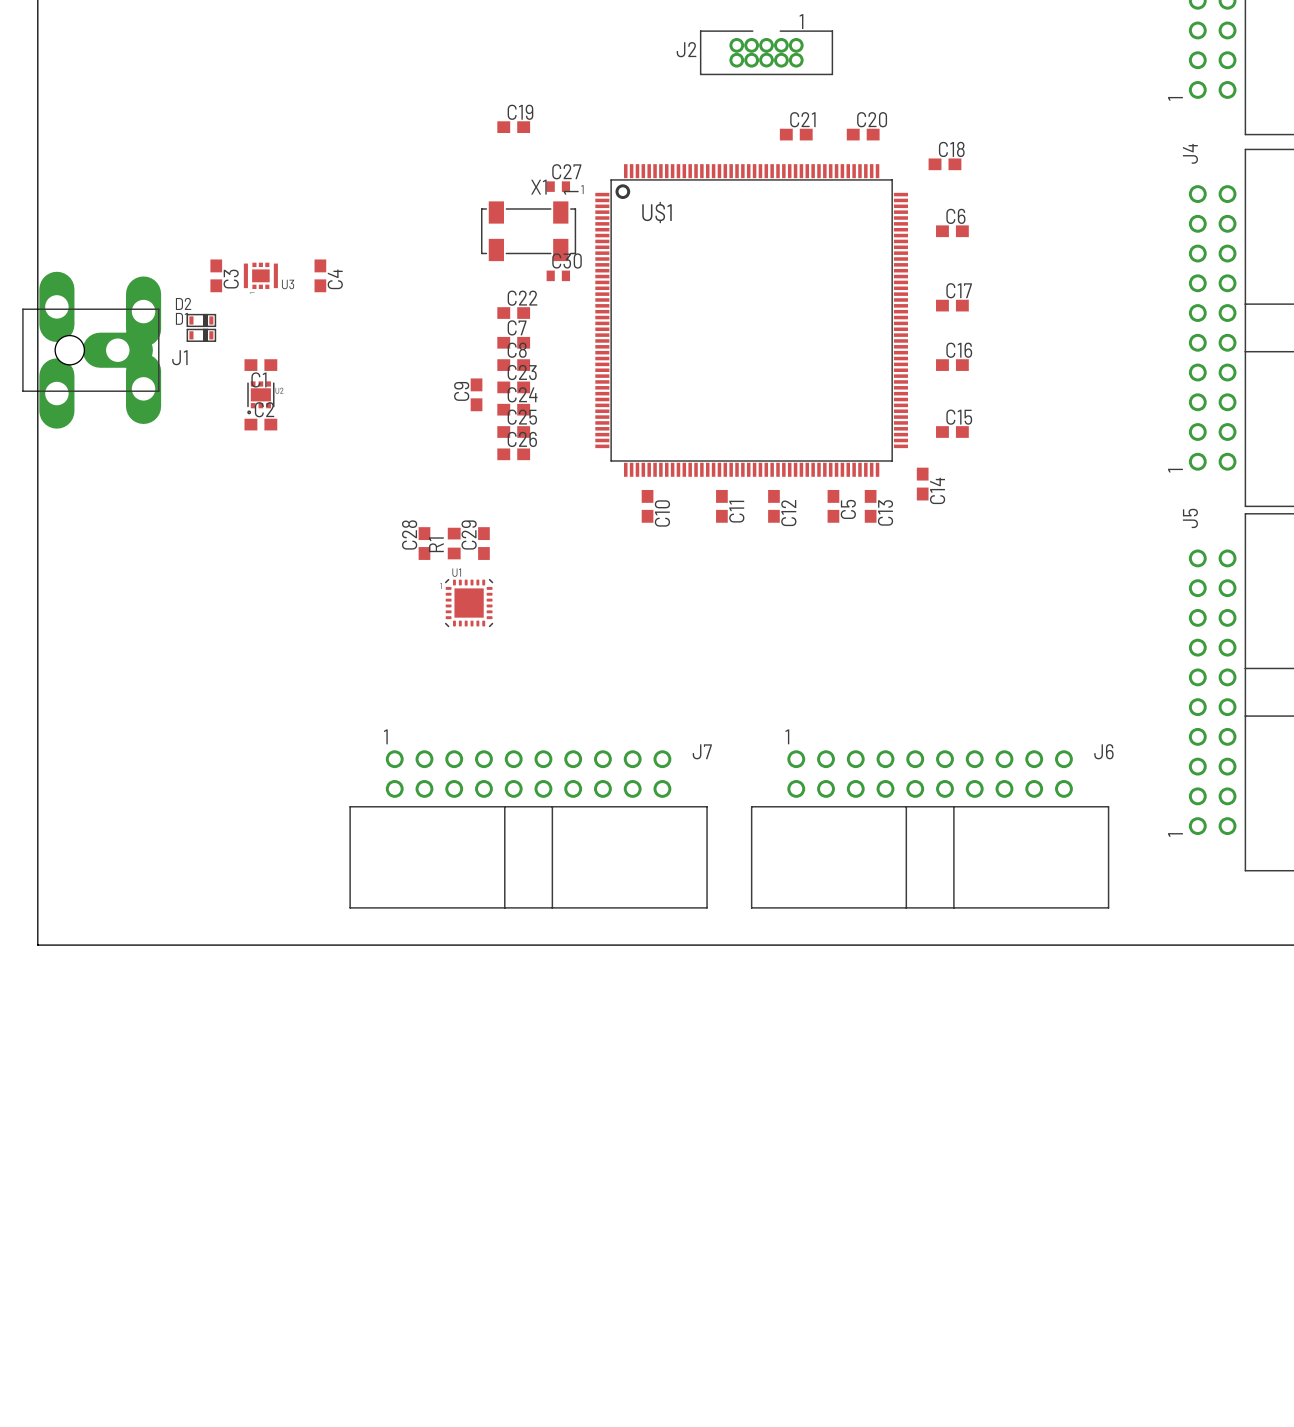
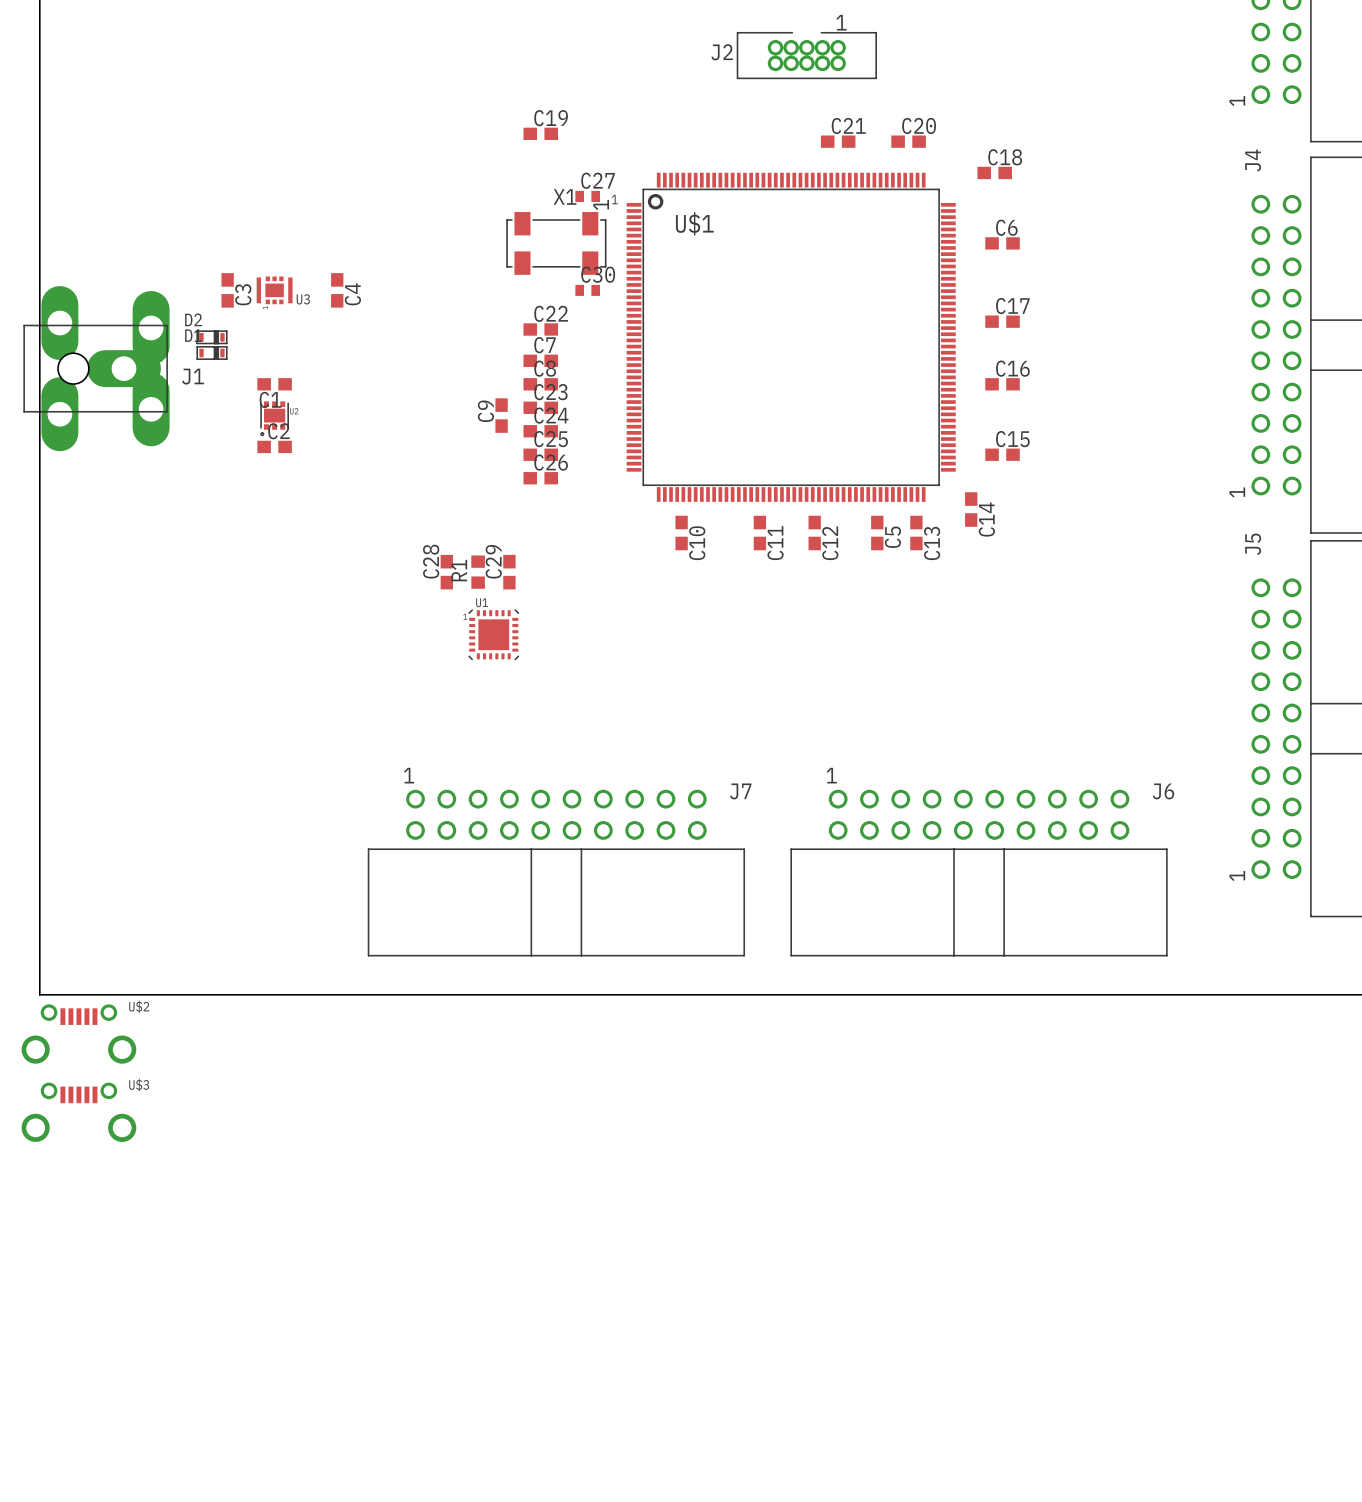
U$2: none -> (78, 1034)
U$3: none -> (78, 1112)

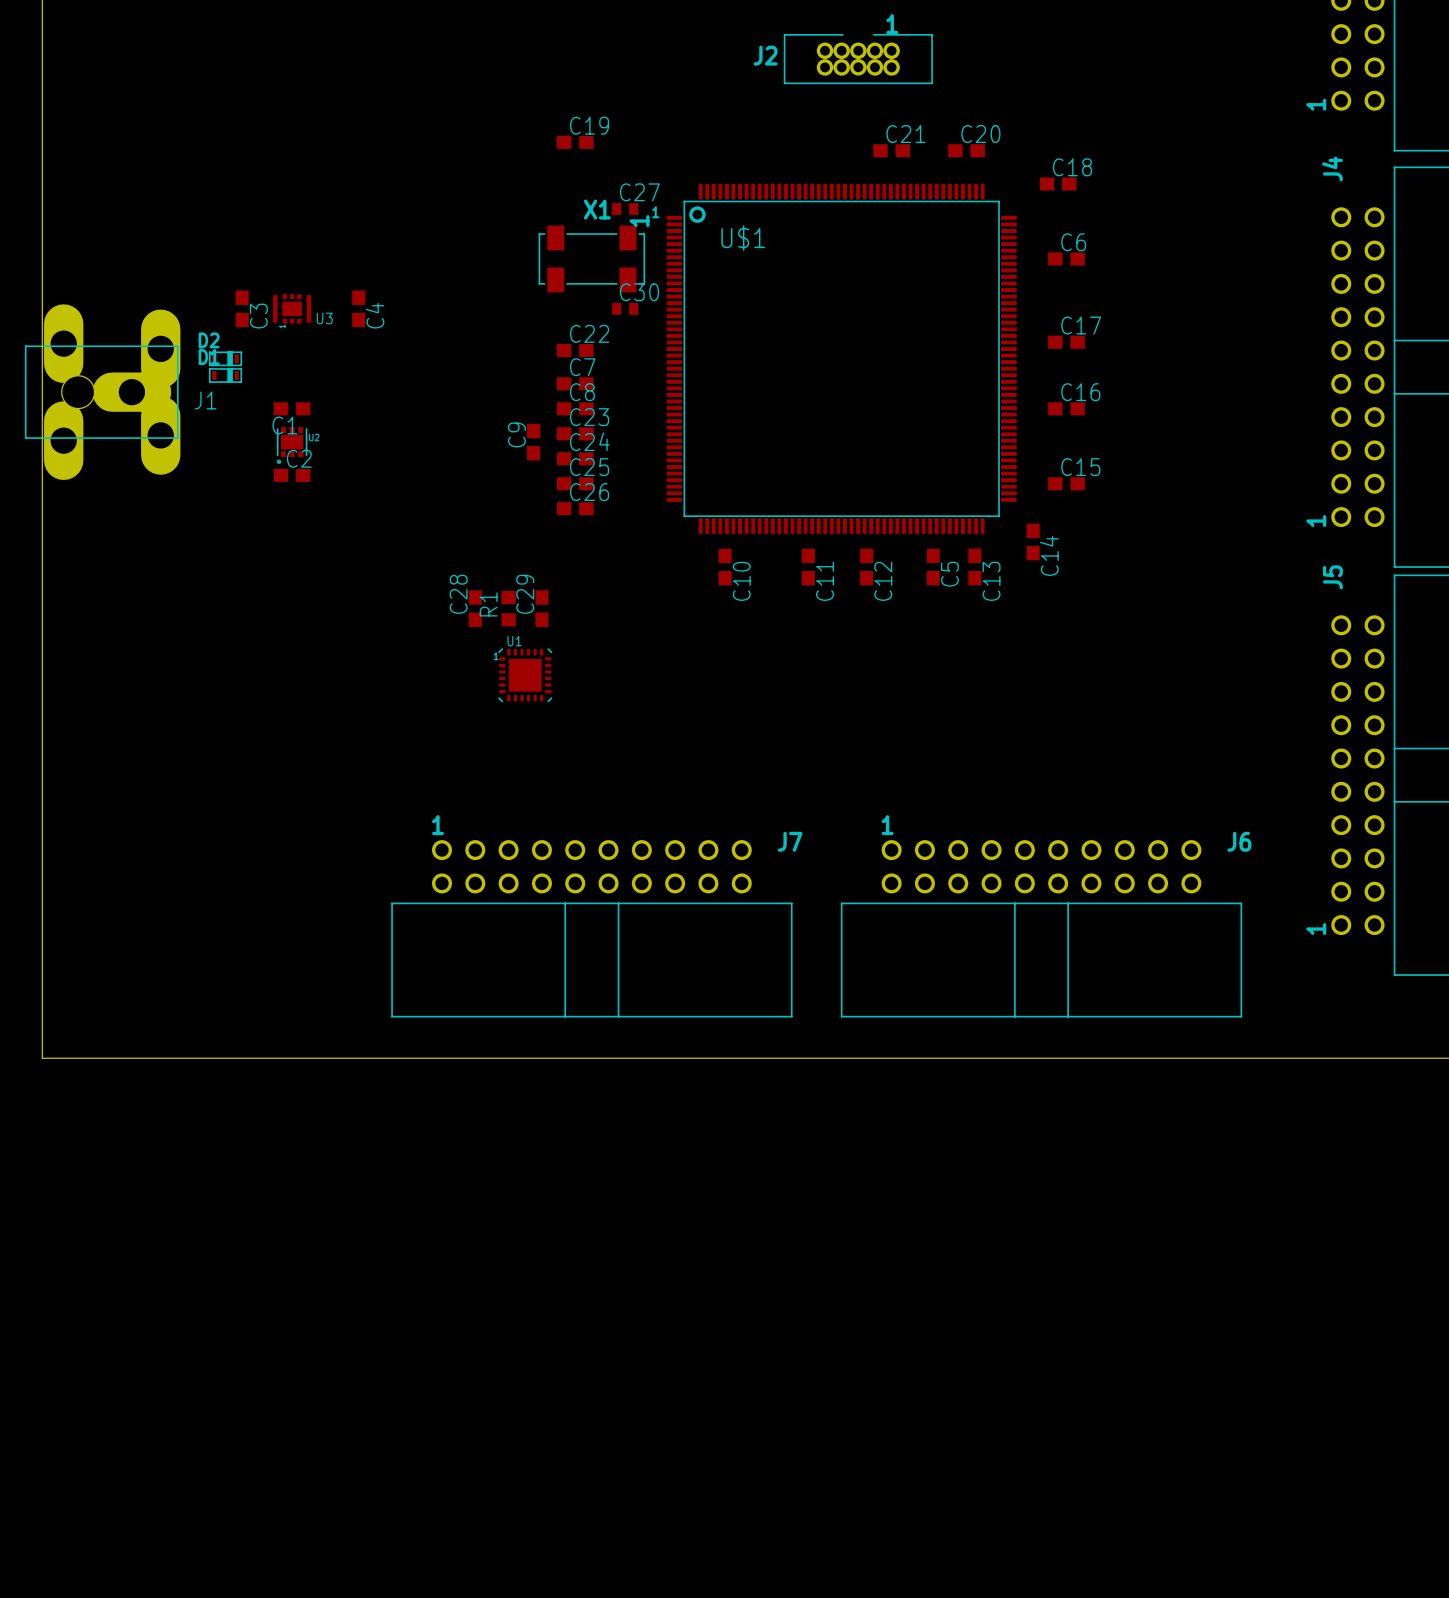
U$2: (78, 1034) -> none
U$3: (78, 1112) -> none

